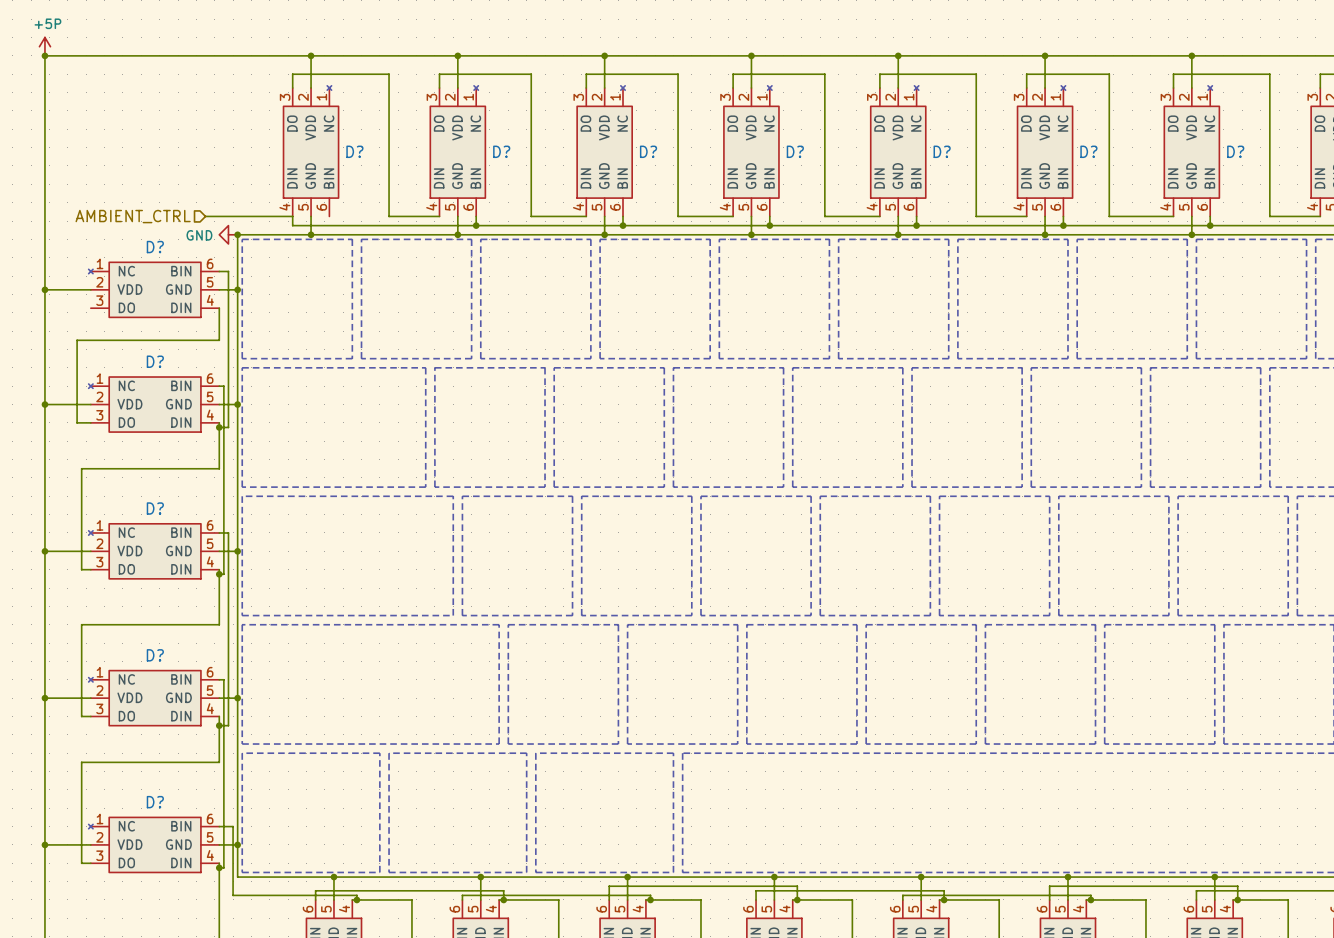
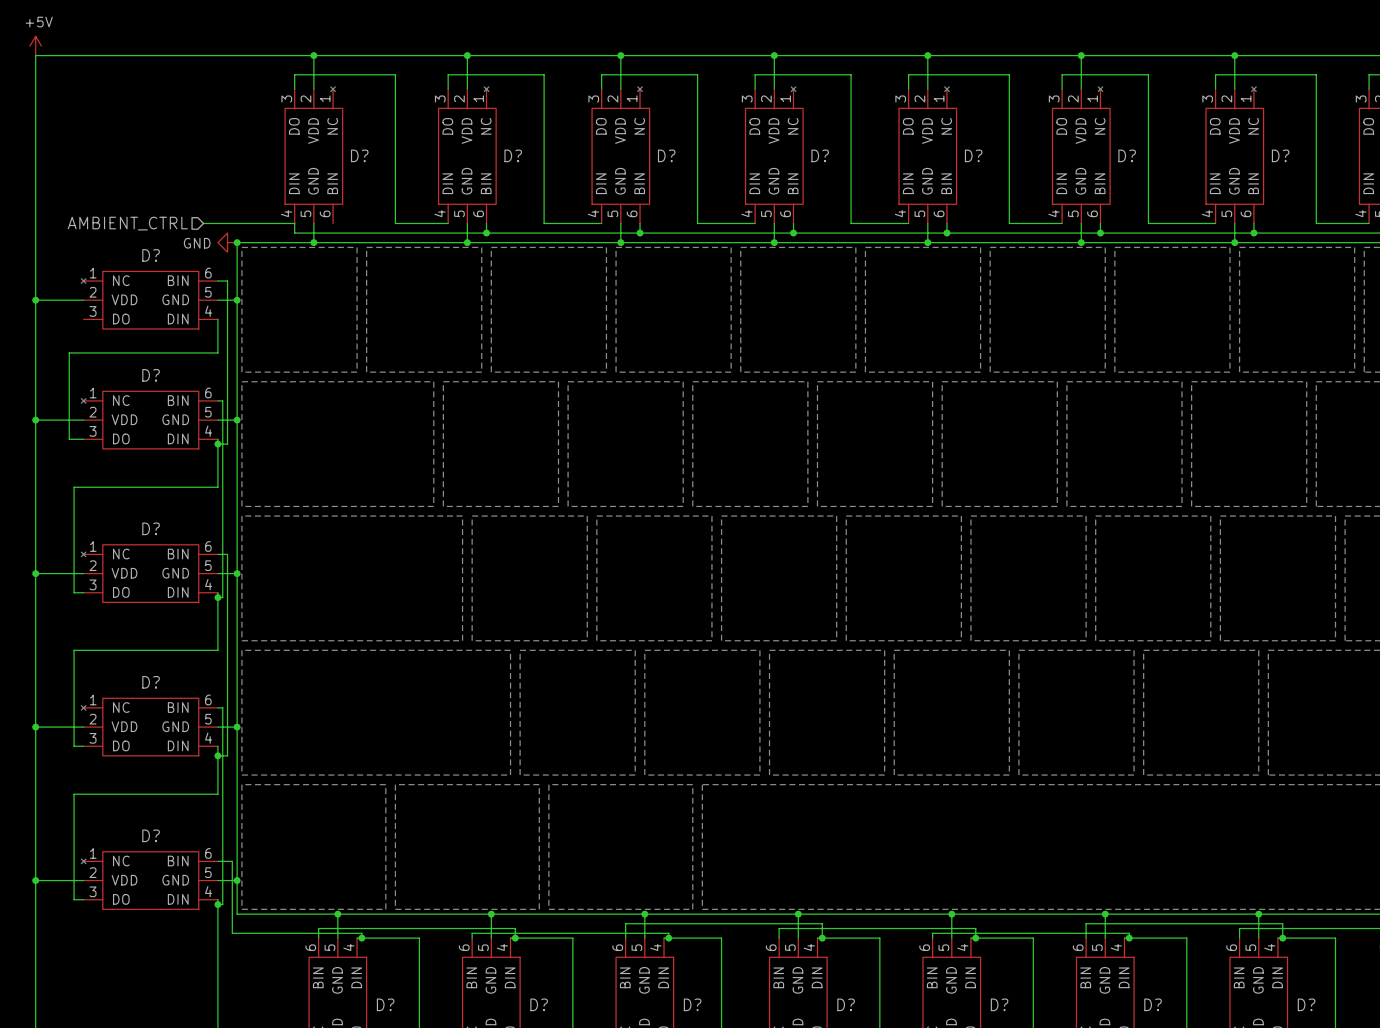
power symbol: +5P (44, 46) -> +5V (35, 45)
junction: (44, 55) -> none

